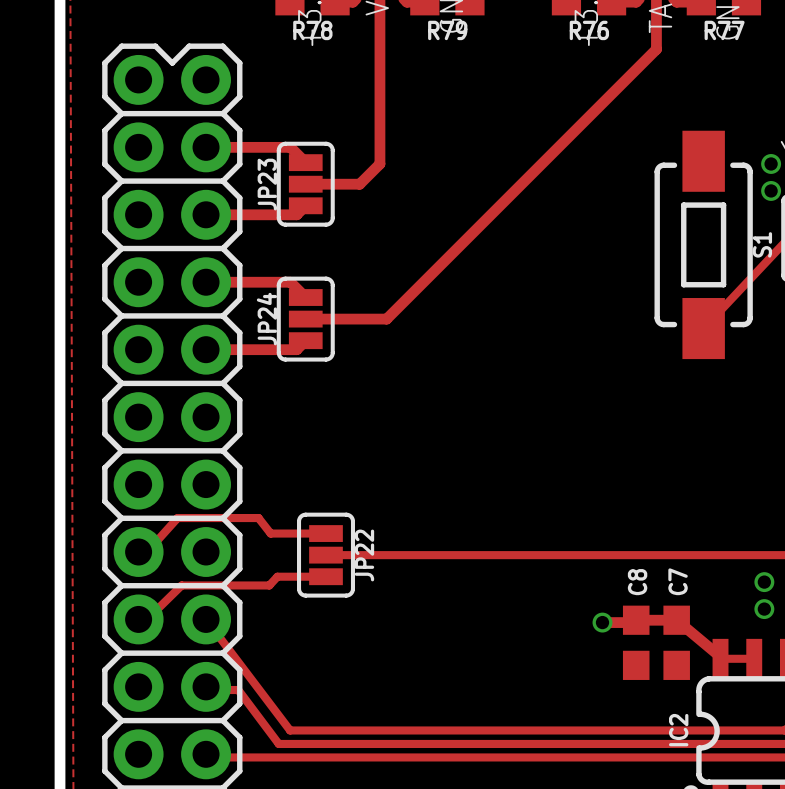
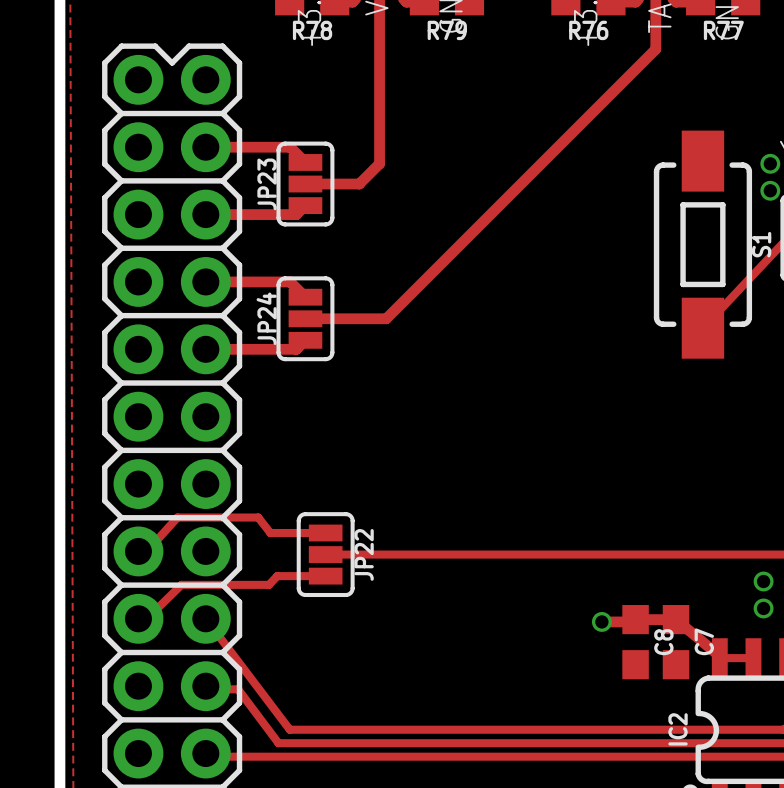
C7 name position: C7 (678, 581) -> C7 (704, 641)
C8 name position: C8 (637, 582) -> C8 (663, 642)

